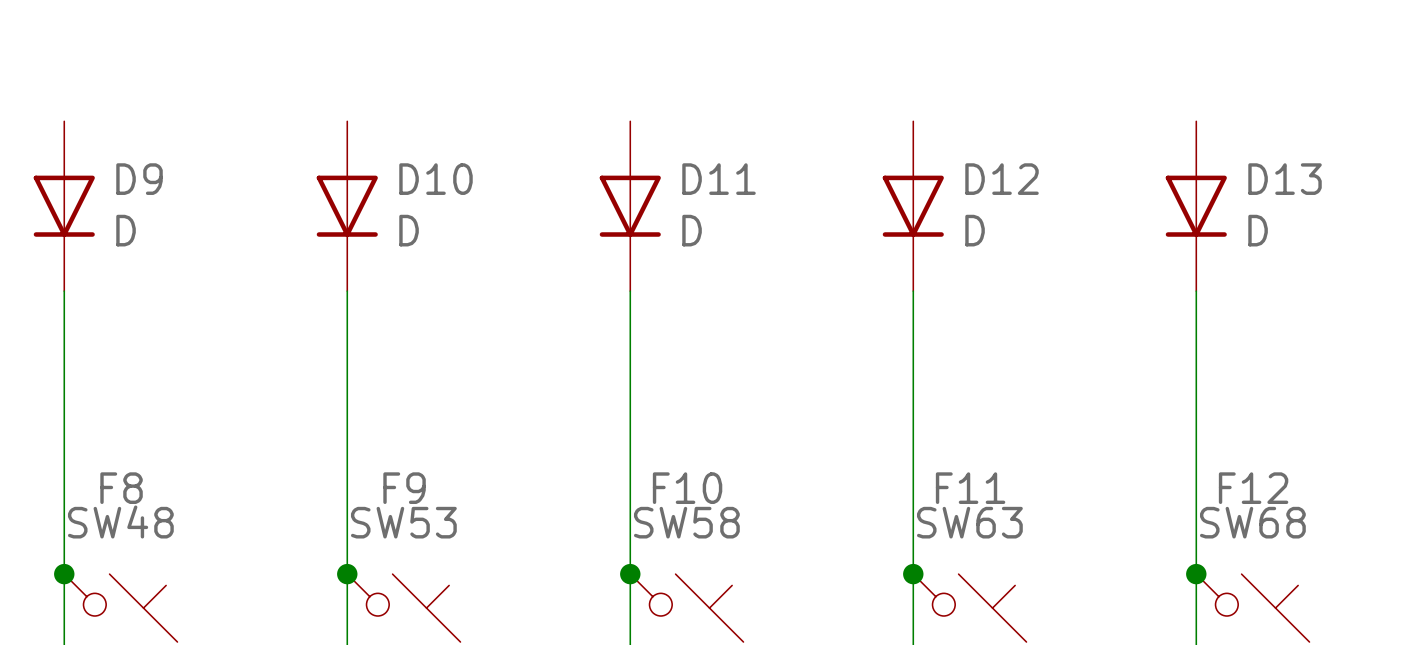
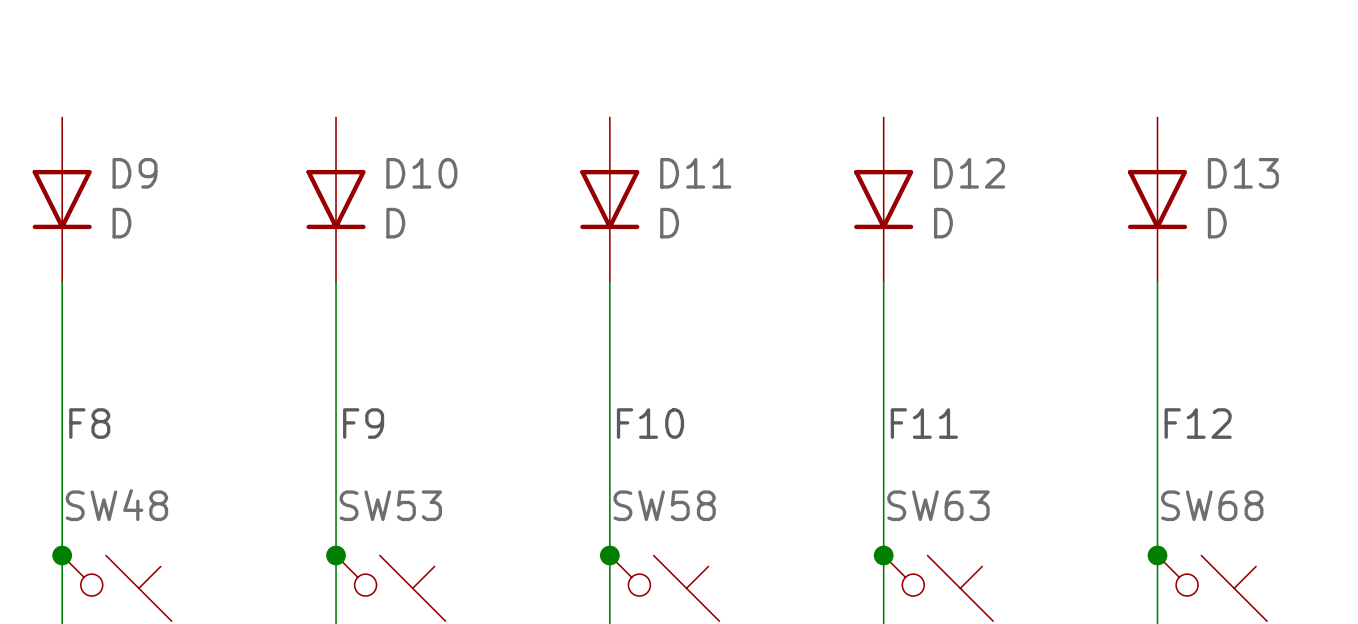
text: none -> F8 (89, 423)
text: none -> F9 (363, 423)
text: none -> F10 (650, 423)
text: none -> F11 (924, 423)
text: none -> F12 (1198, 423)
SW48 value: F8 (121, 488) -> none
SW53 value: F9 (404, 488) -> none
SW58 value: F10 (687, 488) -> none
SW63 value: F11 (970, 488) -> none
SW68 value: F12 (1253, 488) -> none

